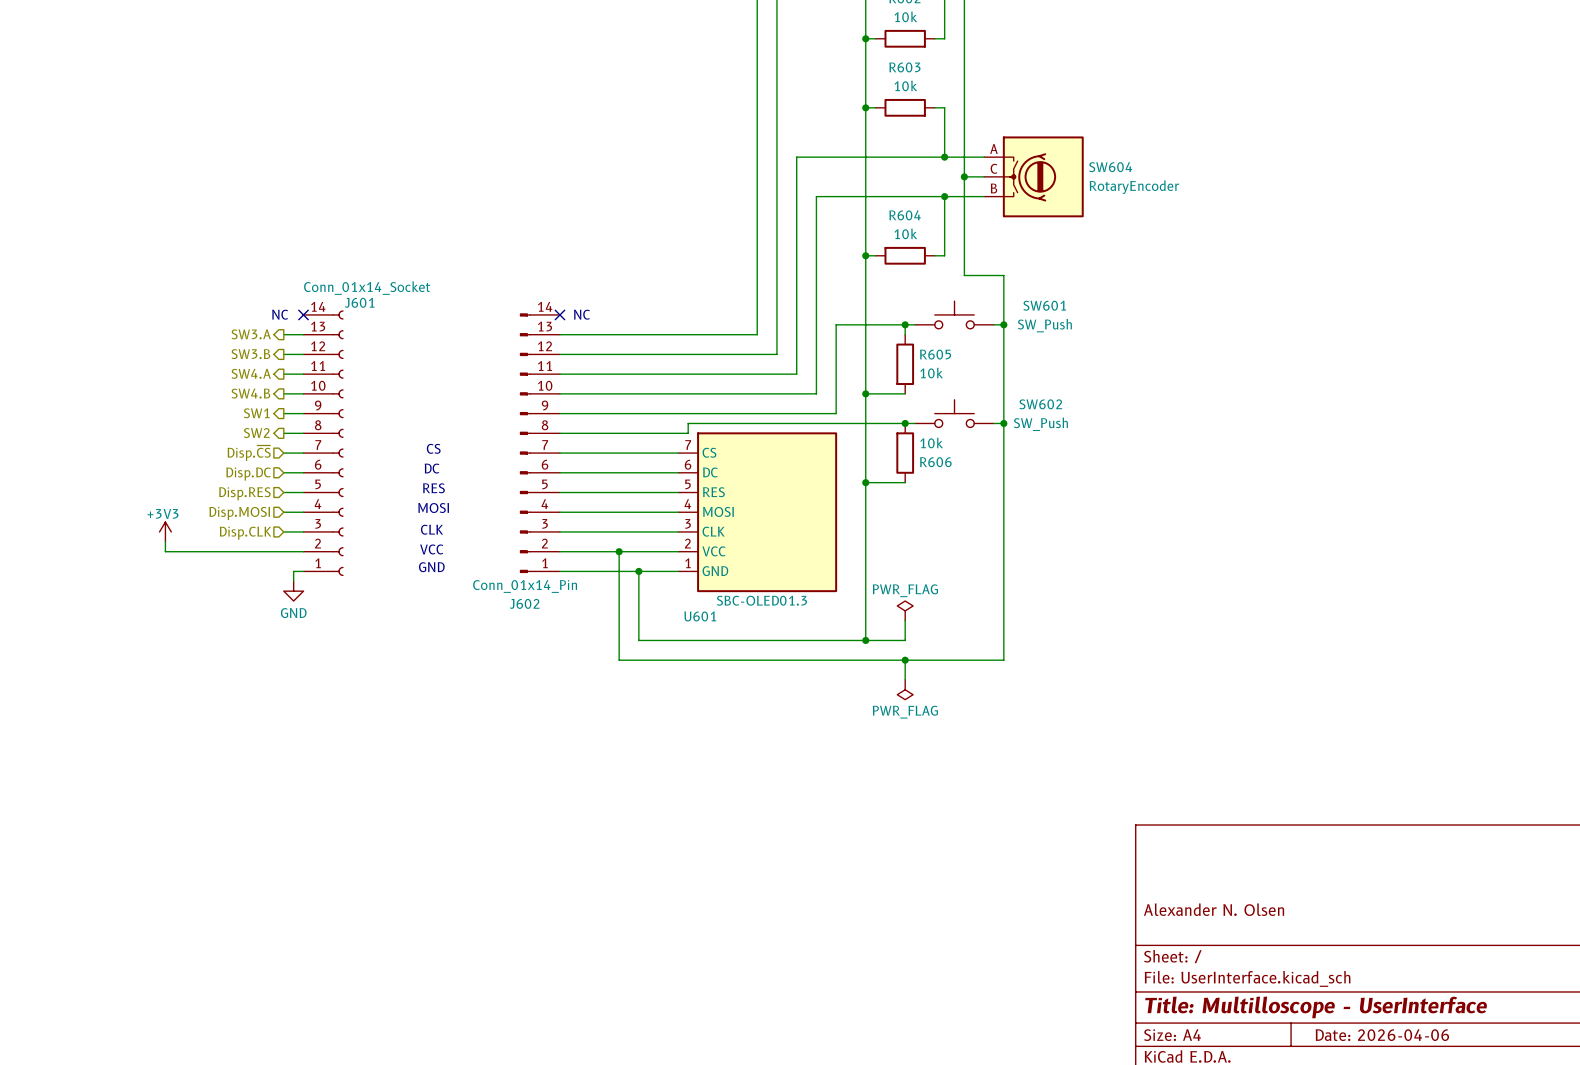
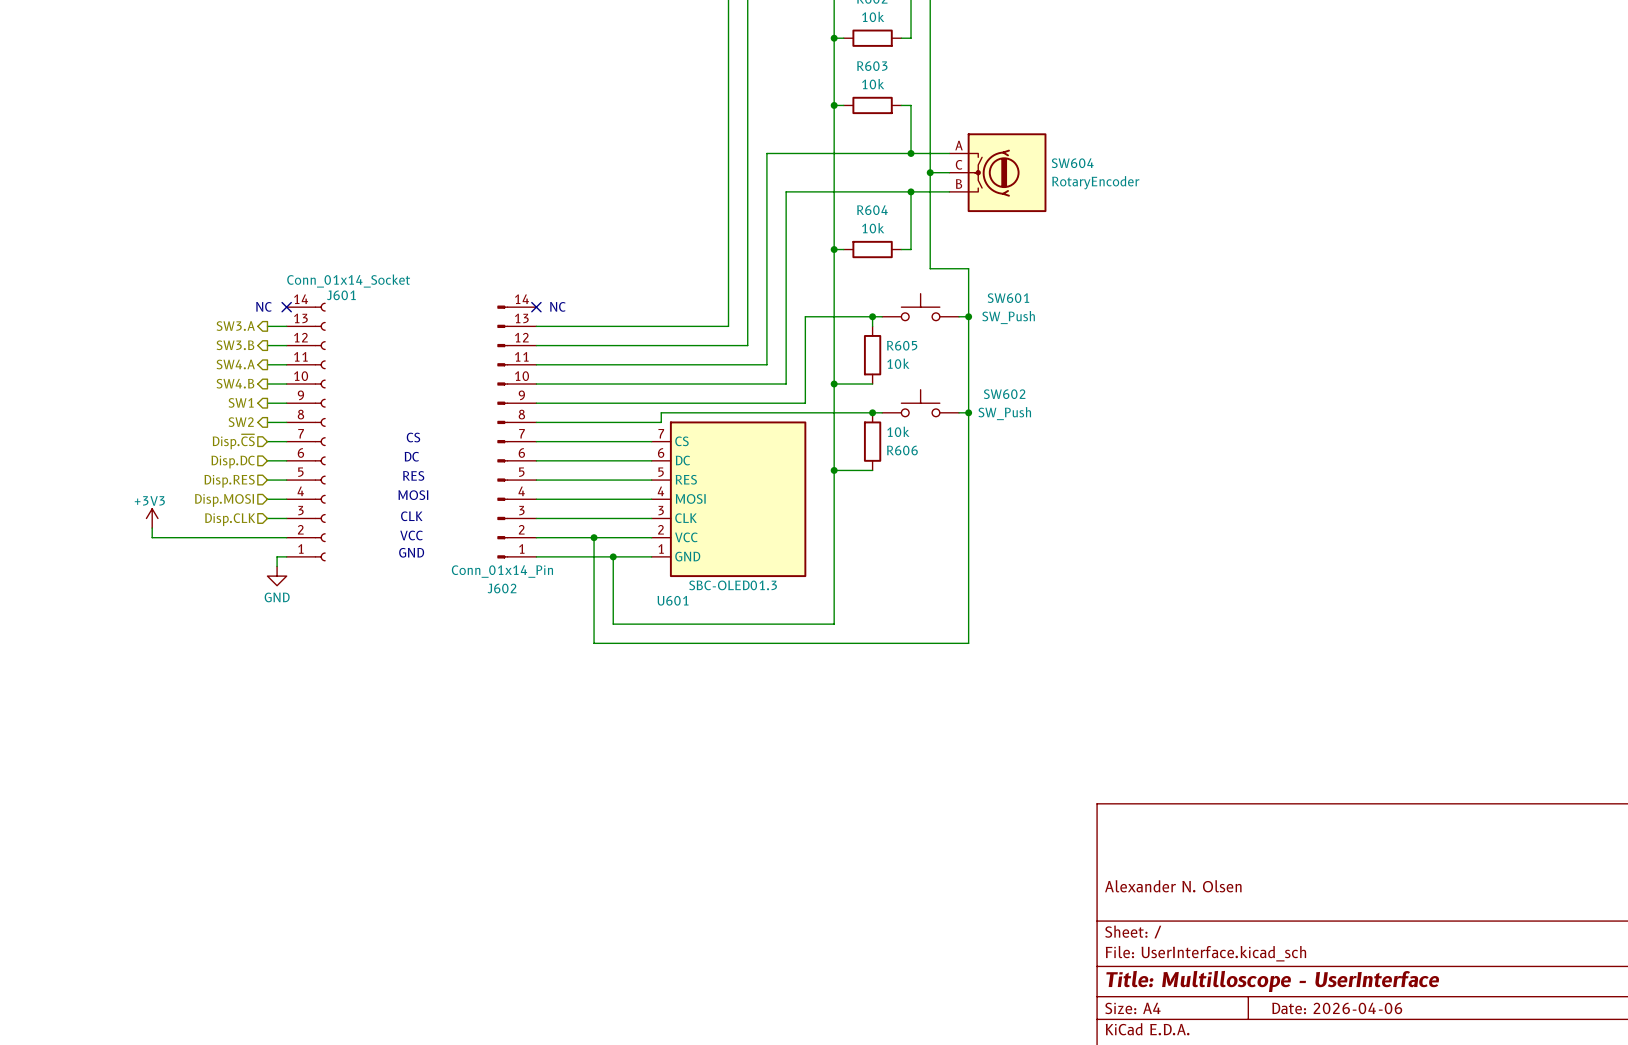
power symbol: PWR_FLAG (905, 610) -> none
wire: (905, 620) (905, 640) (865, 640) -> none
junction: (865, 640) -> none
wire: (905, 660) (905, 679) -> none
junction: (905, 660) -> none
power symbol: PWR_FLAG (905, 689) -> none

